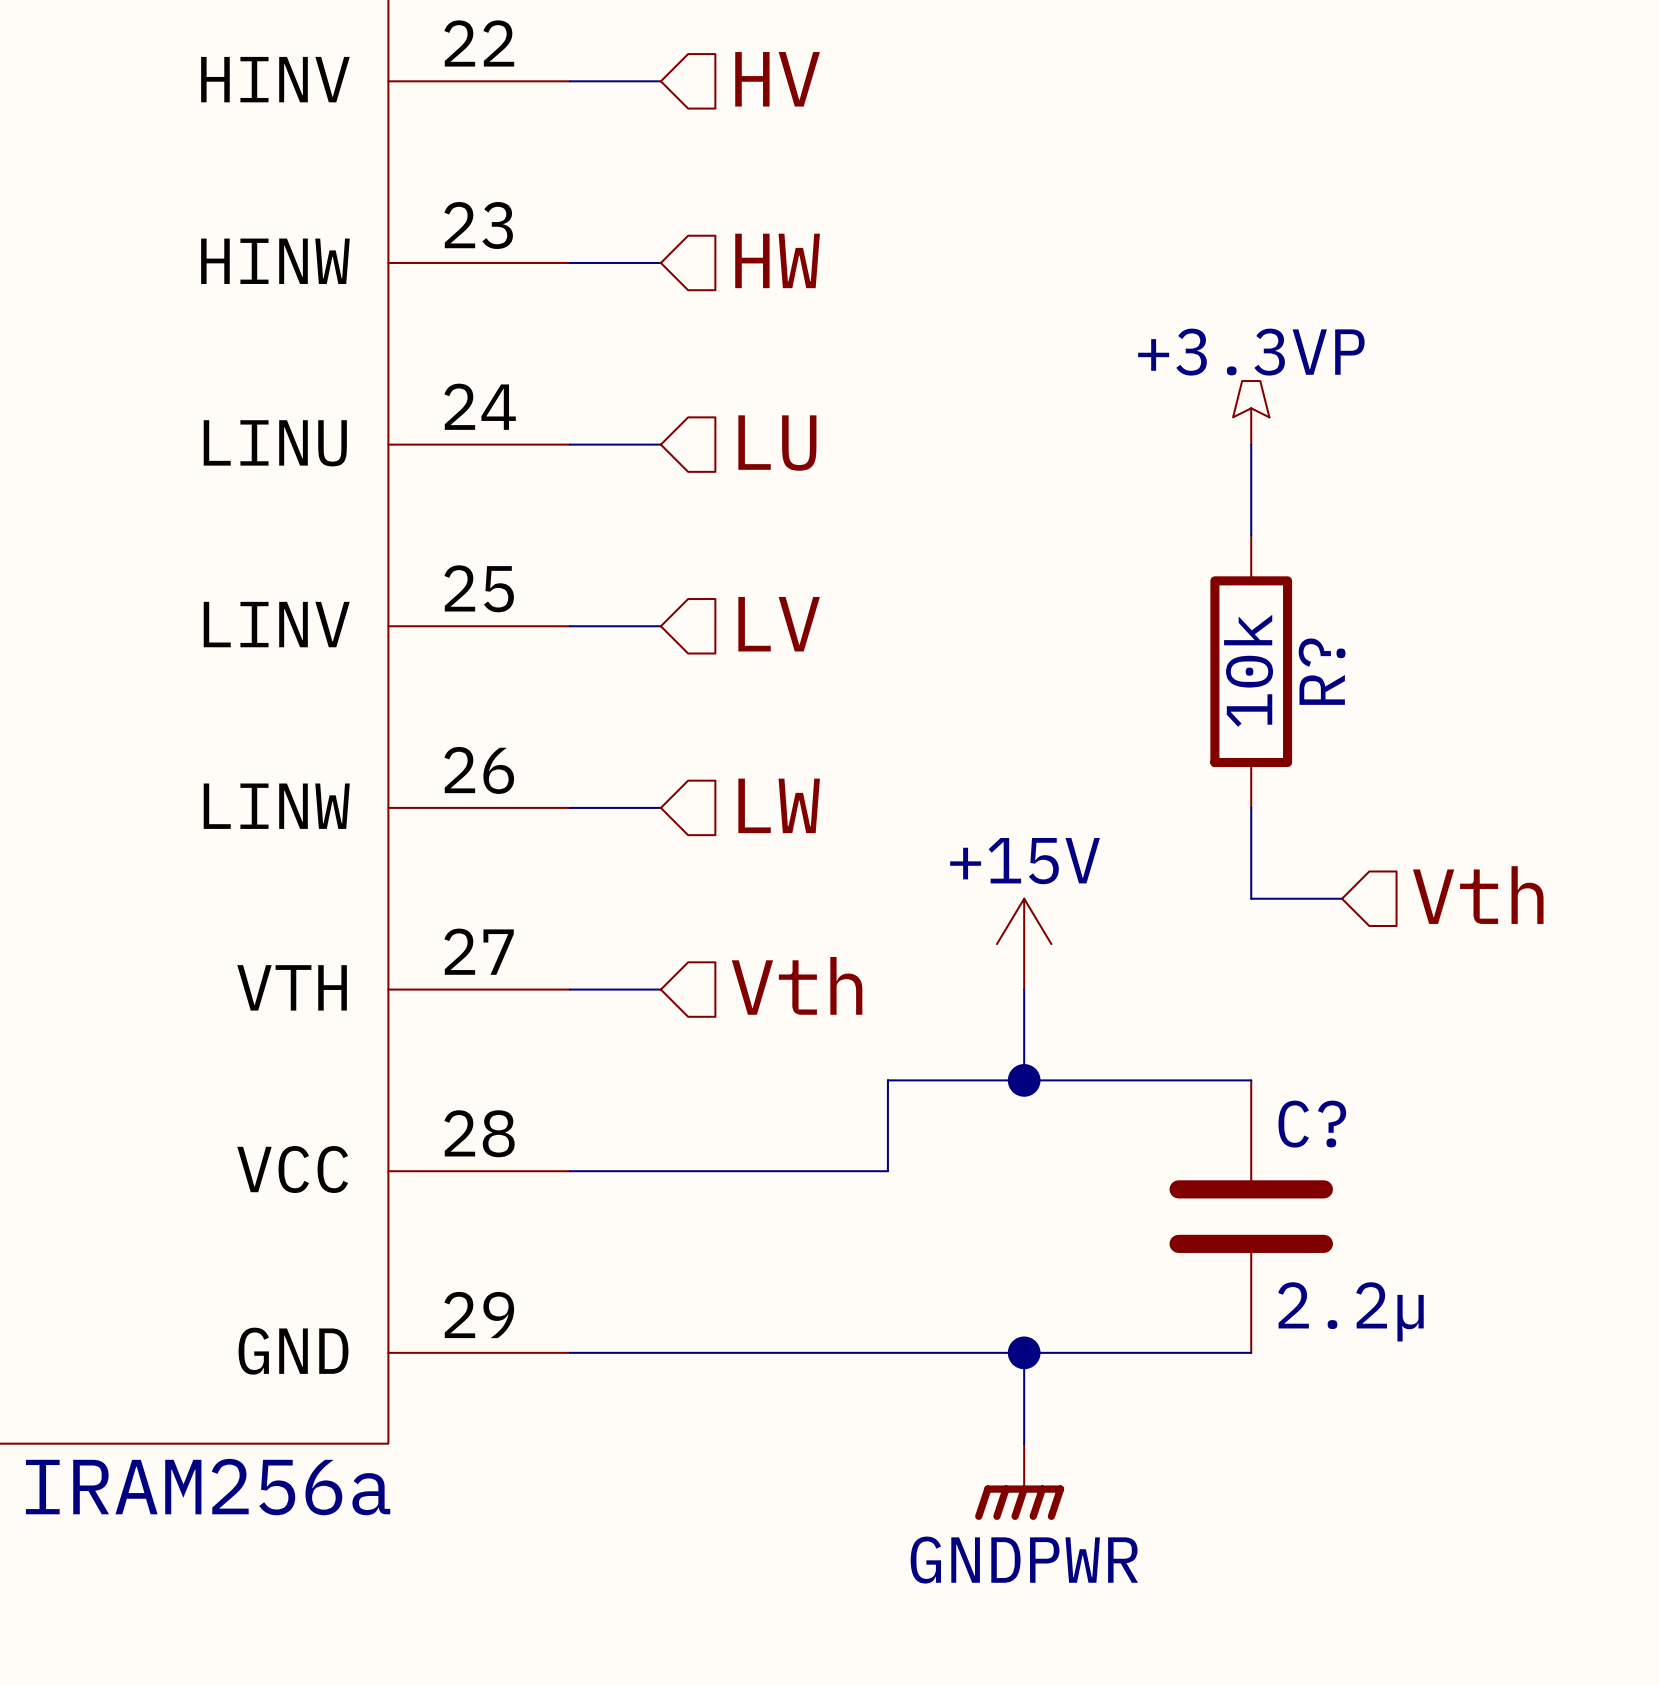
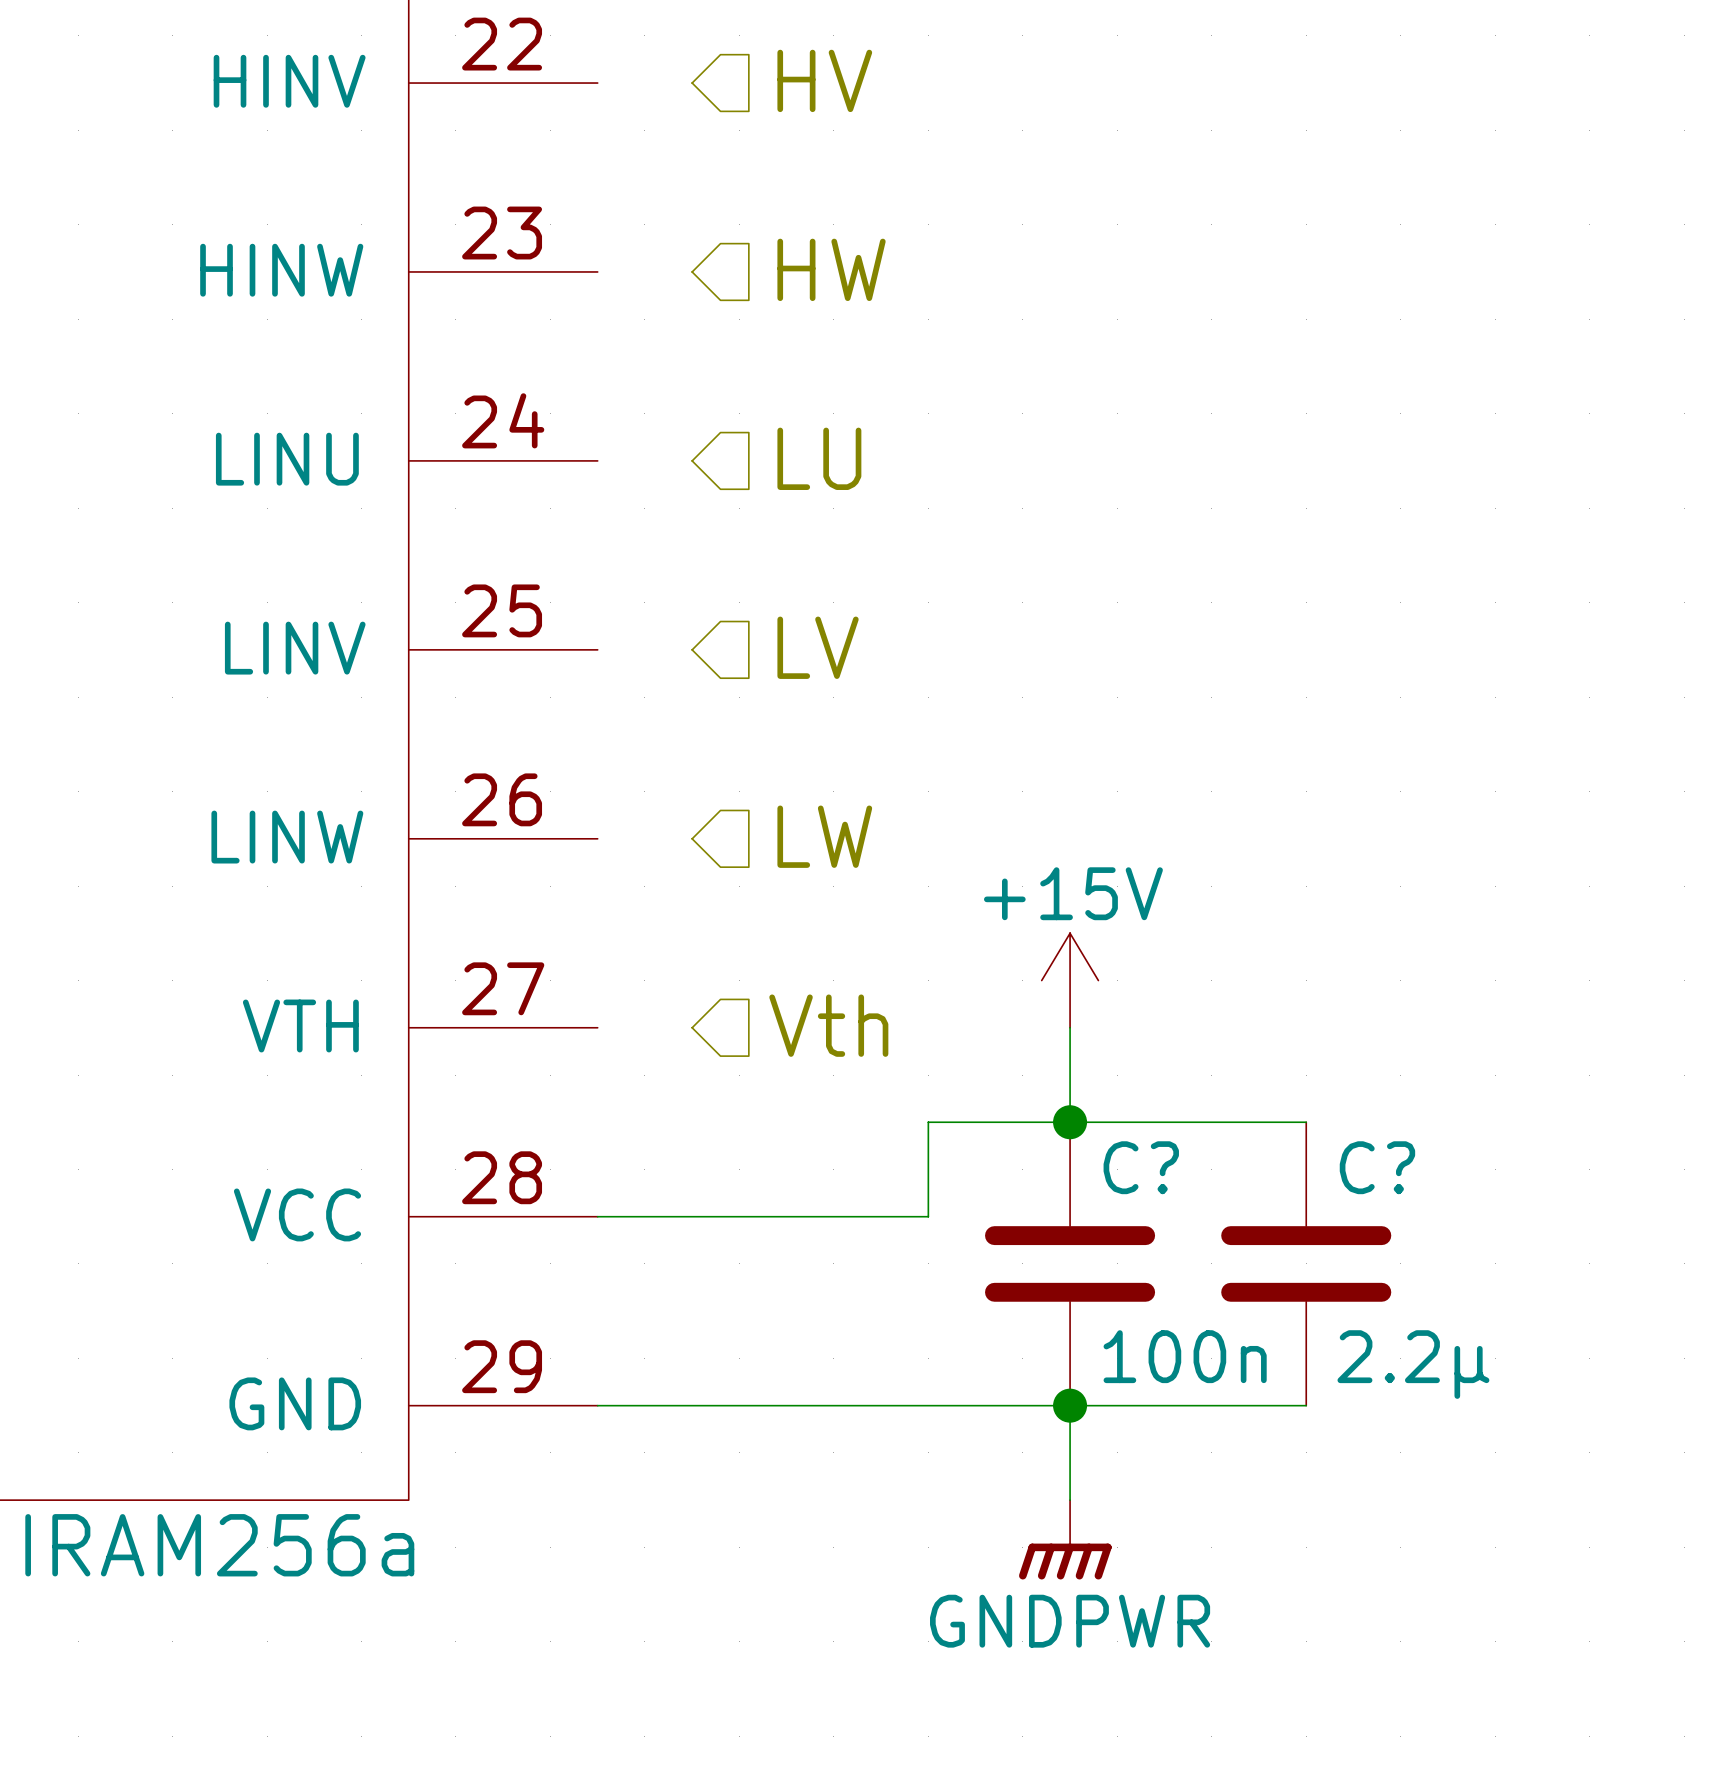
wire: (570, 81) (660, 81) -> none
wire: (570, 262) (660, 262) -> none
power symbol: +3.3VP (1251, 412) -> none
wire: (570, 444) (660, 444) -> none
wire: (1251, 444) (1251, 535) -> none
wire: (570, 626) (660, 626) -> none
R?: 10k (1251, 671) -> none
wire: (570, 807) (660, 807) -> none
wire: (1251, 807) (1251, 898) (1342, 898) -> none
hierarchical label: Vth (1478, 895) -> none
wire: (570, 989) (660, 989) -> none
C?: none -> 100n (1070, 1263)

